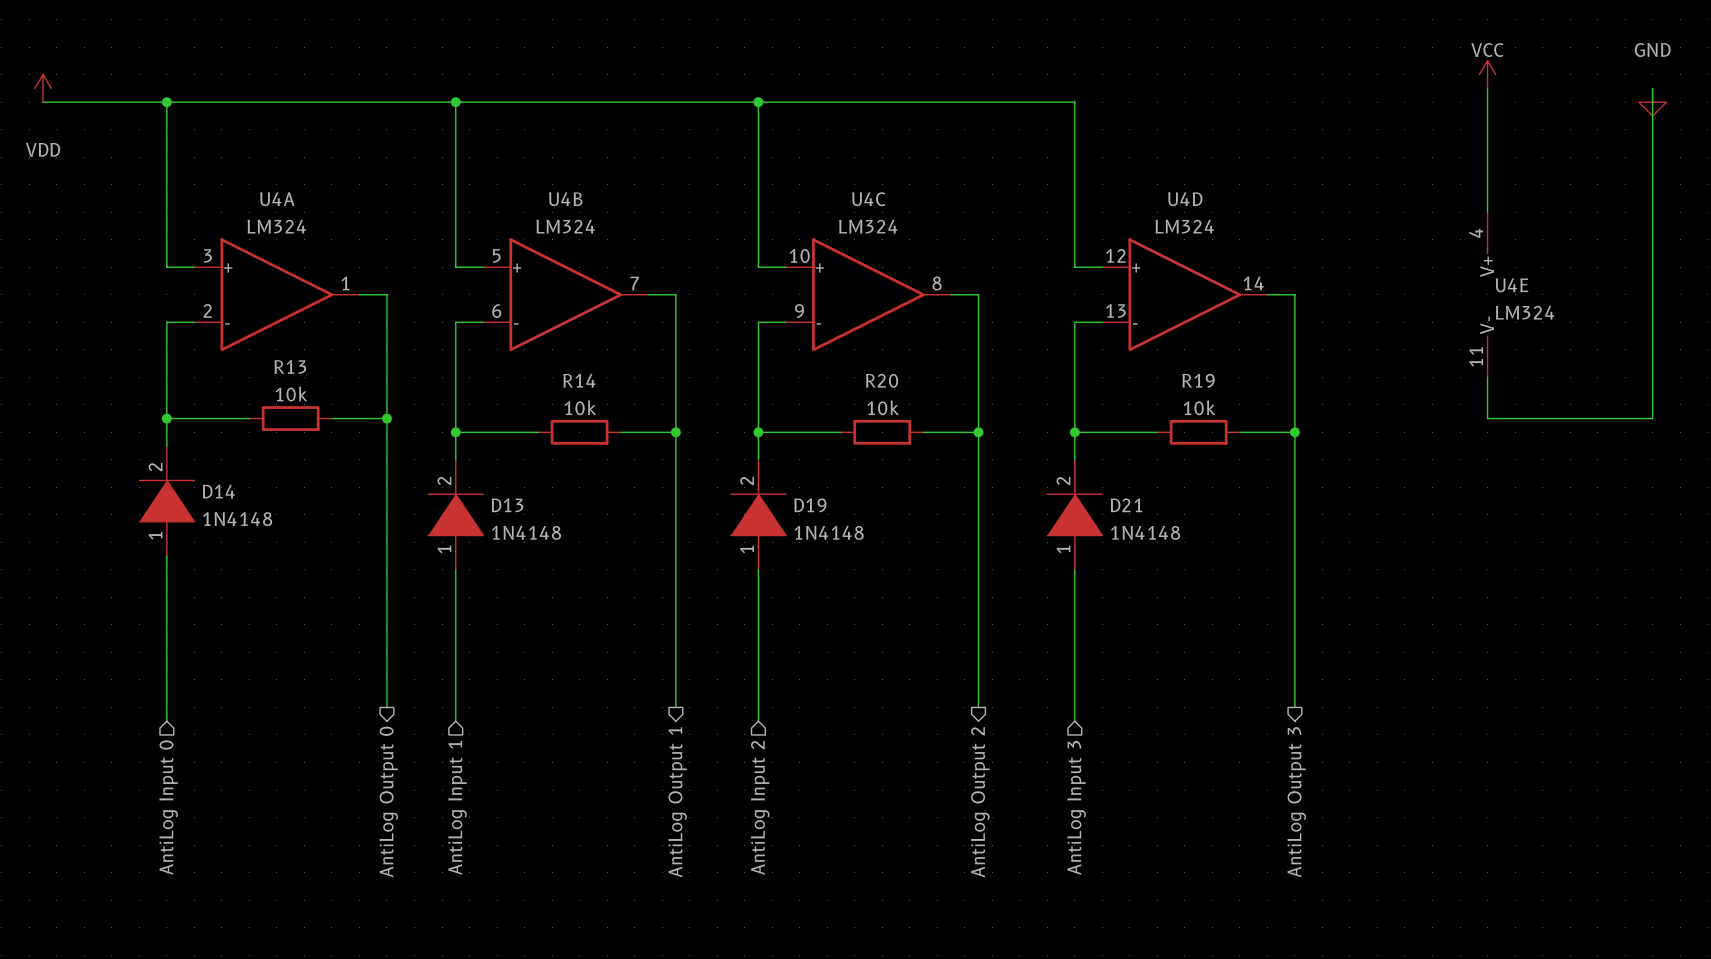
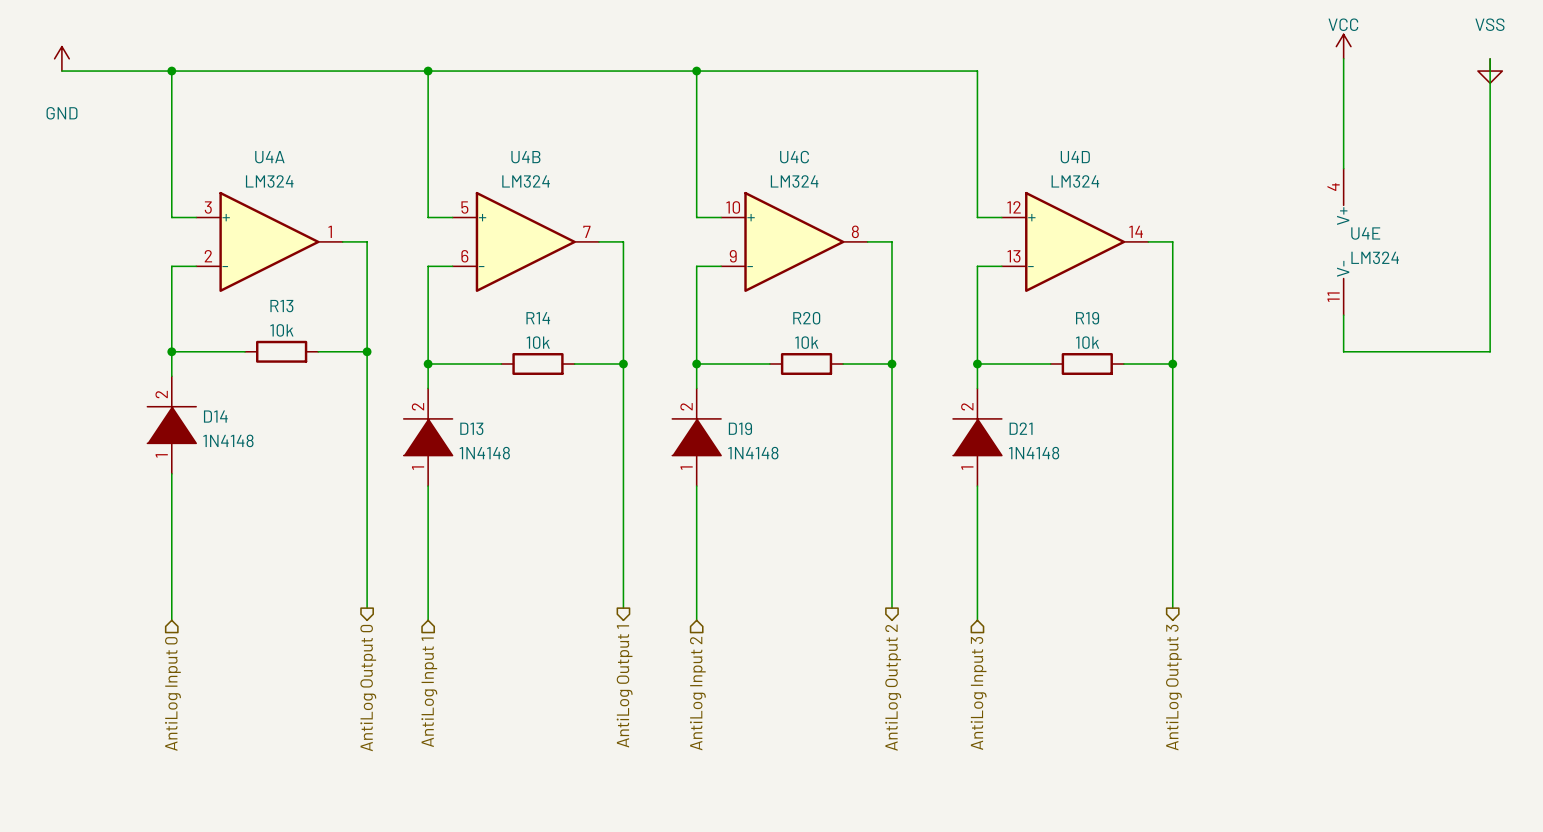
power symbol: VDD (43, 88) -> GND (61, 58)
power symbol: GND (1652, 102) -> VSS (1490, 71)

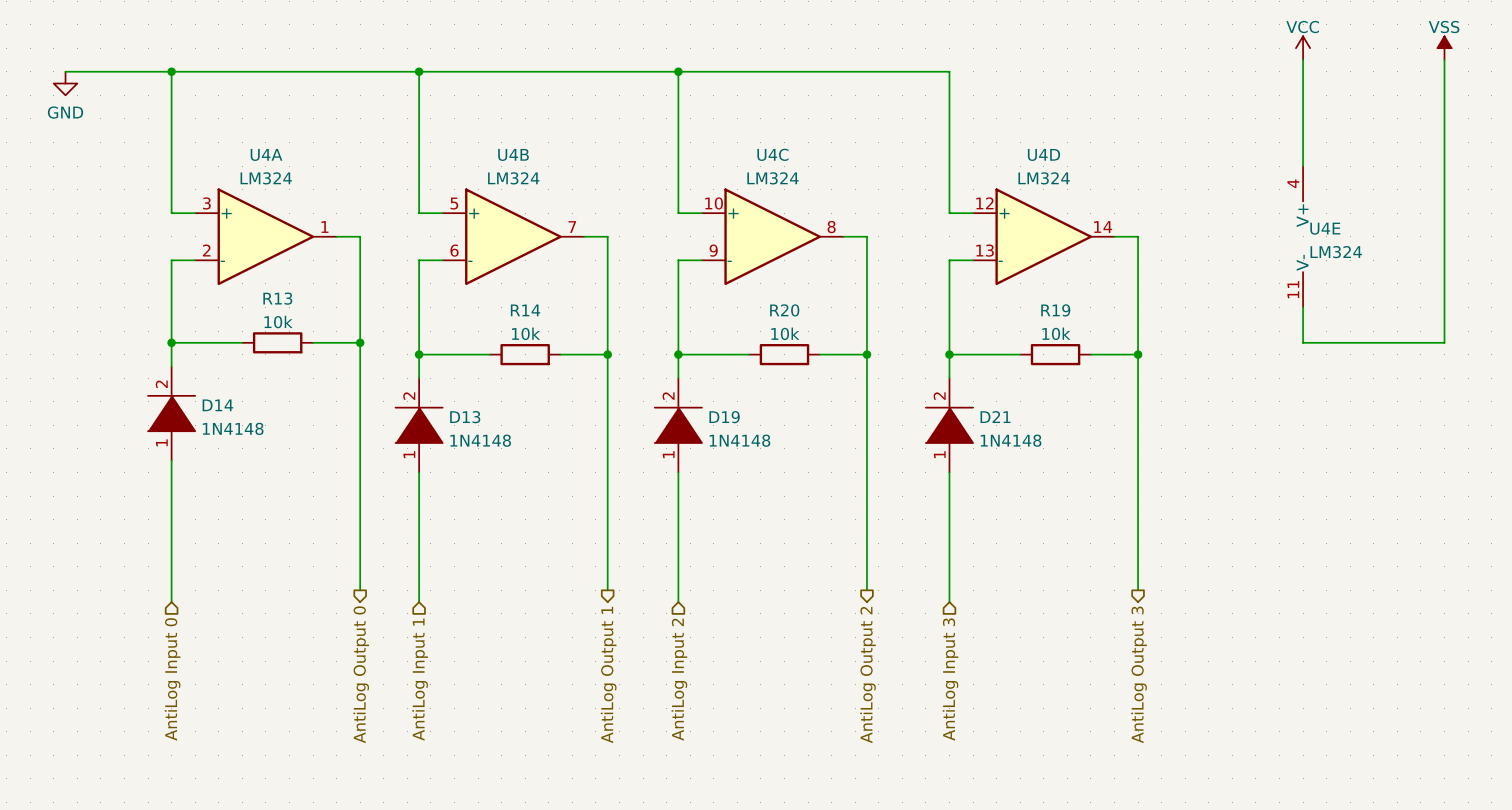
power symbol: none -> VSS (1444, 48)
power symbol: GND (61, 58) -> none
power symbol: VSS (1490, 71) -> none
power symbol: none -> GND (65, 83)

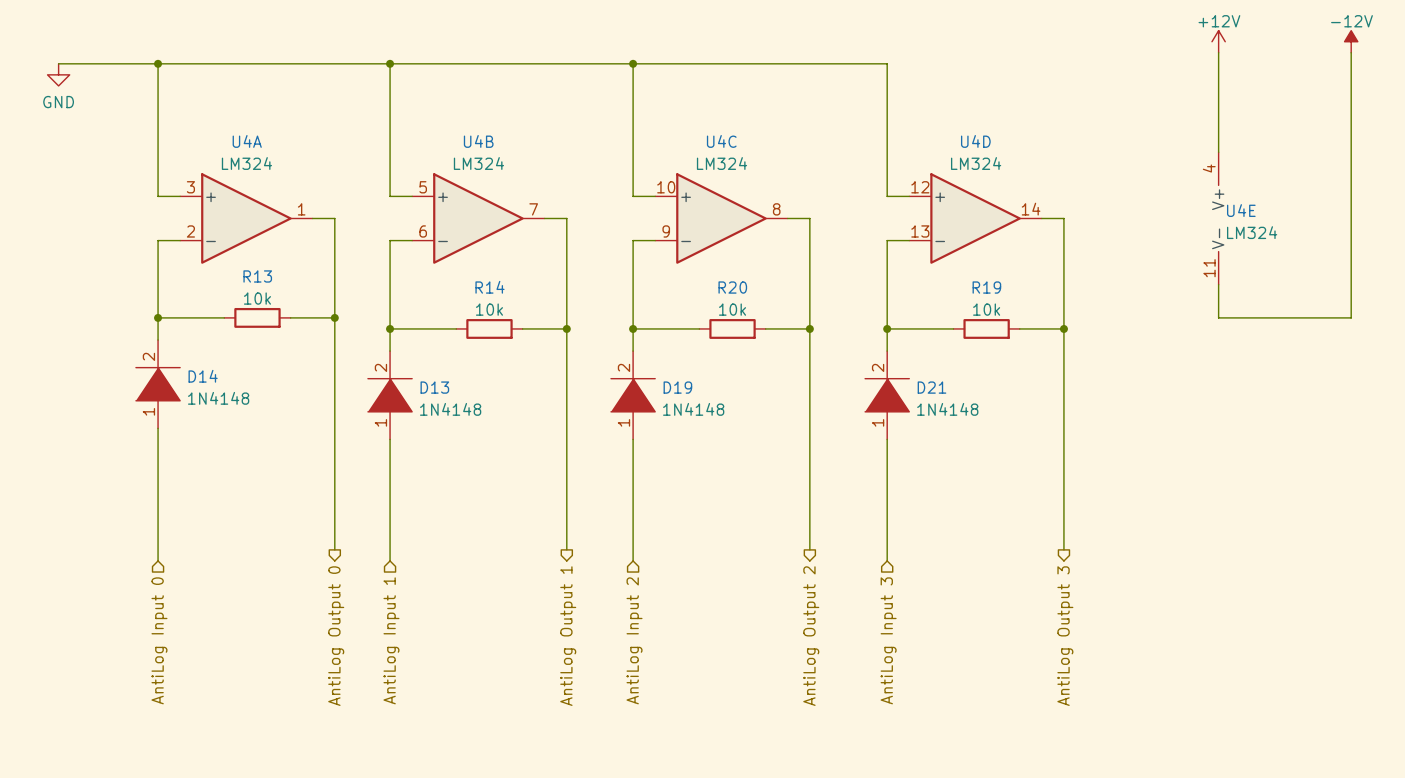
power symbol: VCC (1303, 48) -> +12V (1218, 41)
power symbol: VSS (1444, 48) -> -12V (1351, 41)

